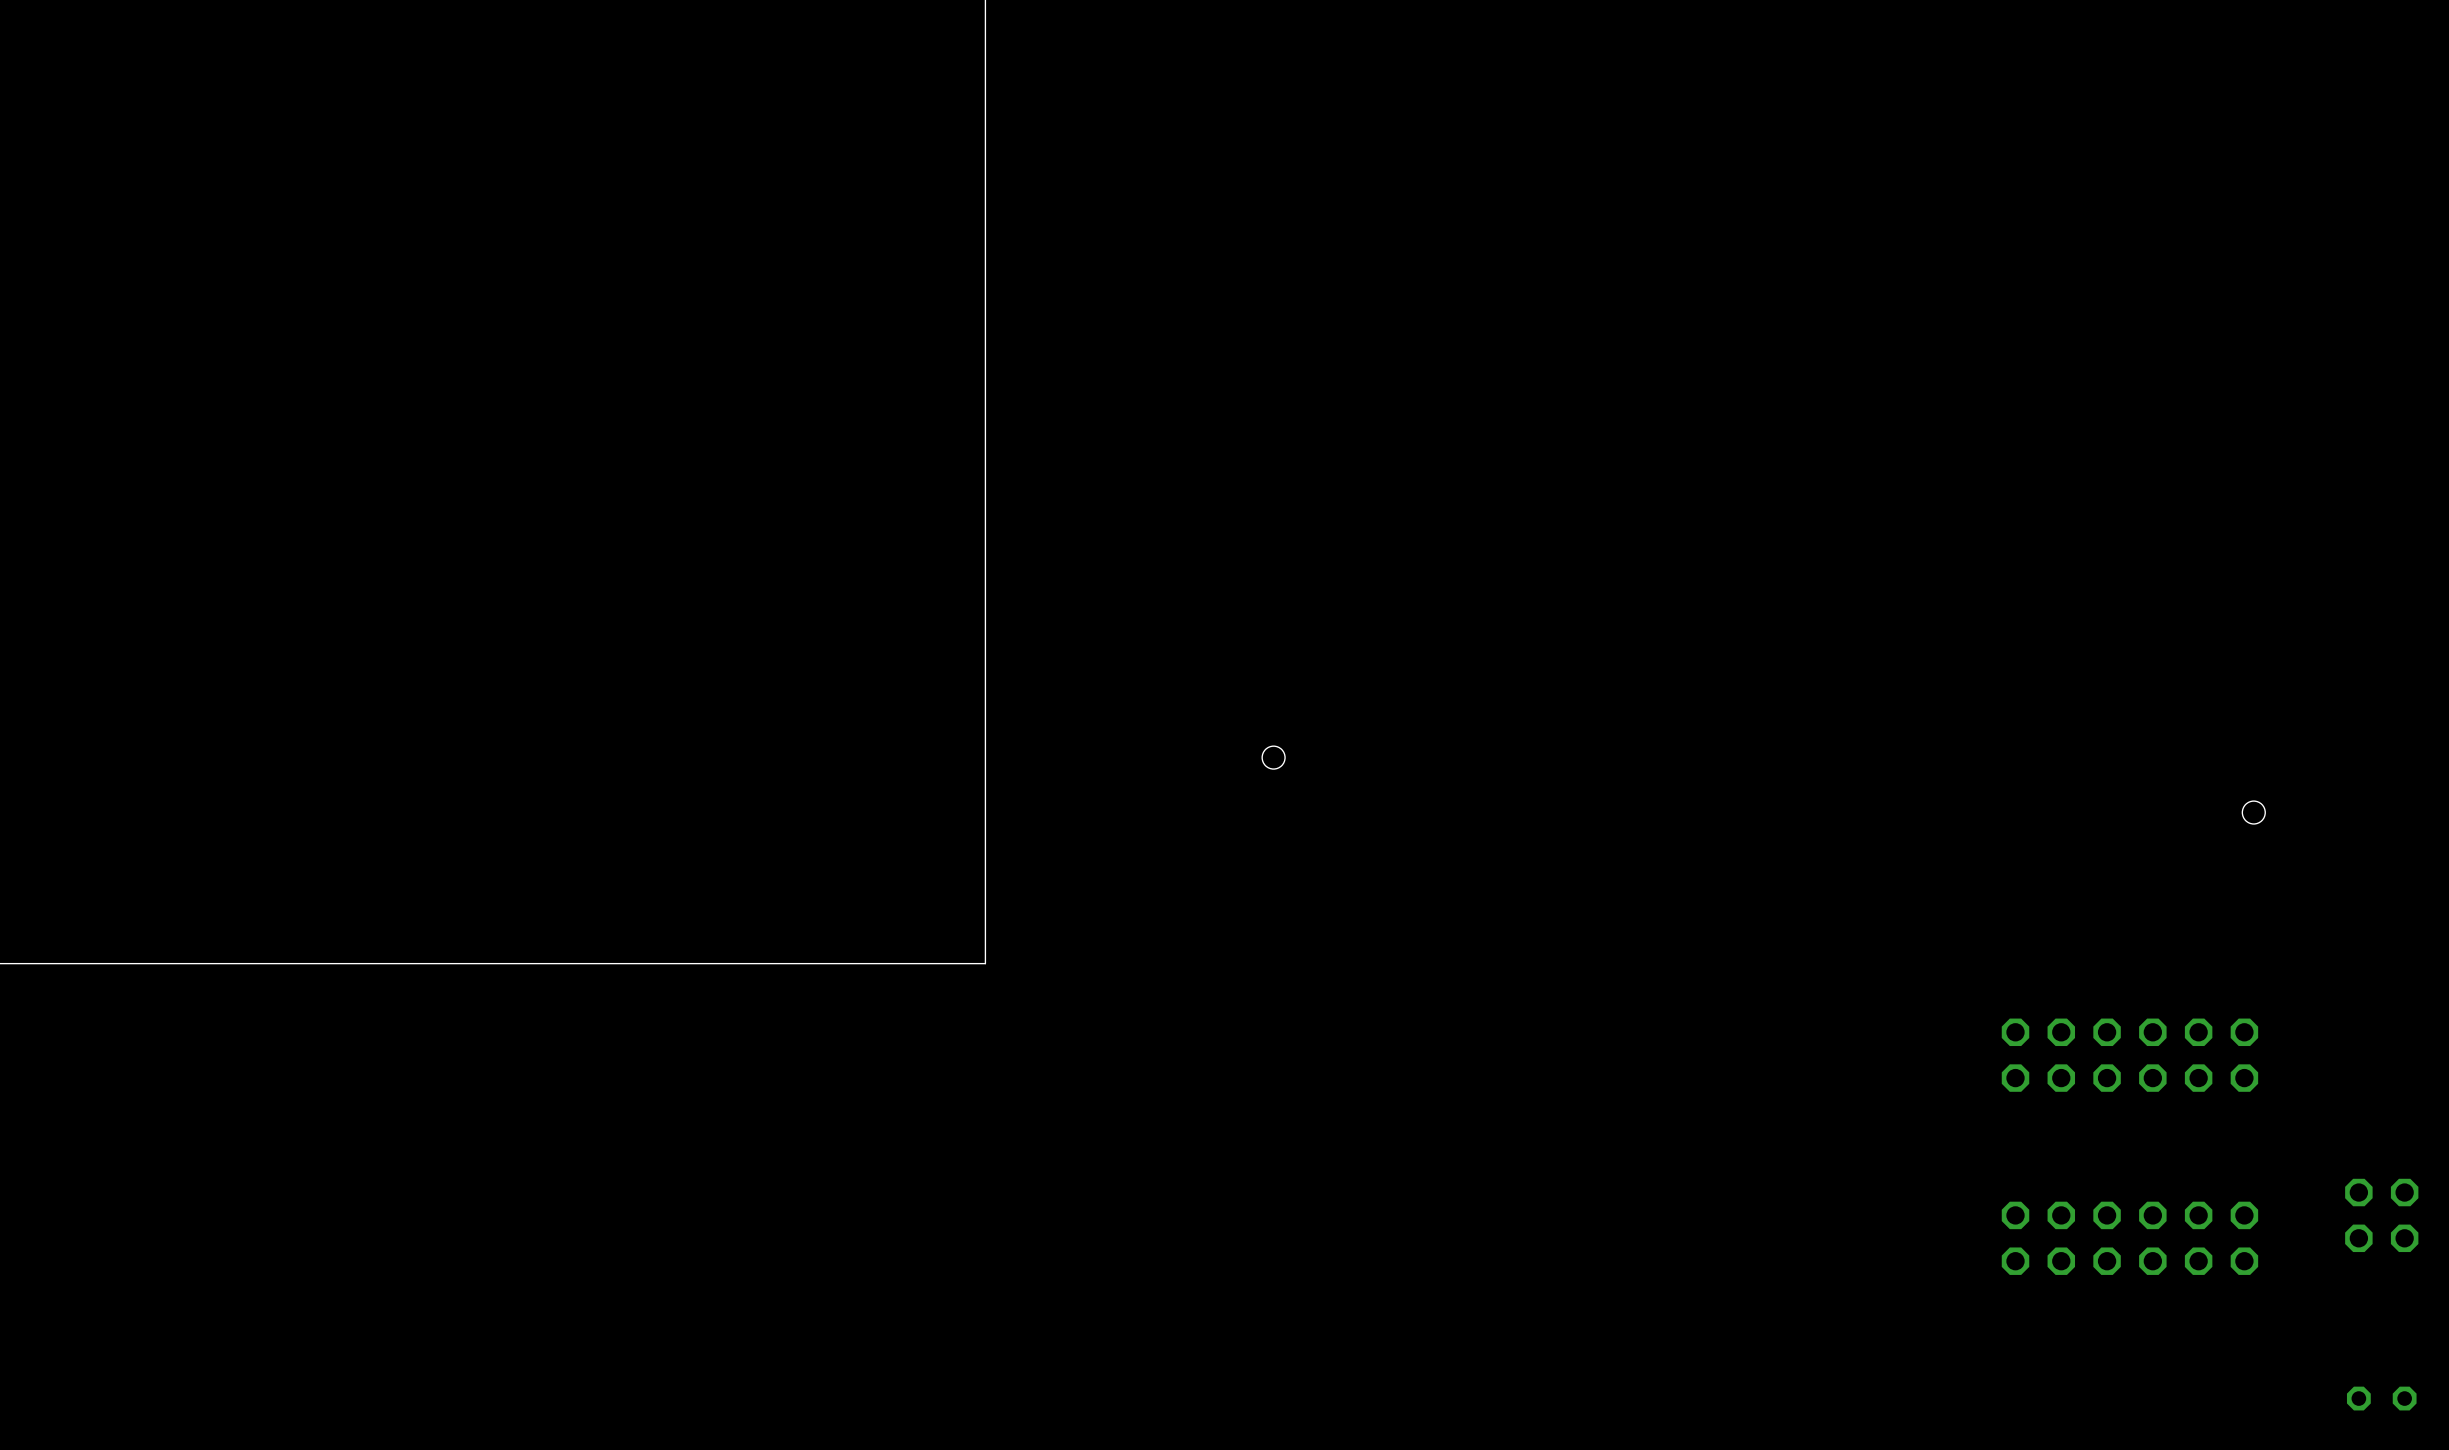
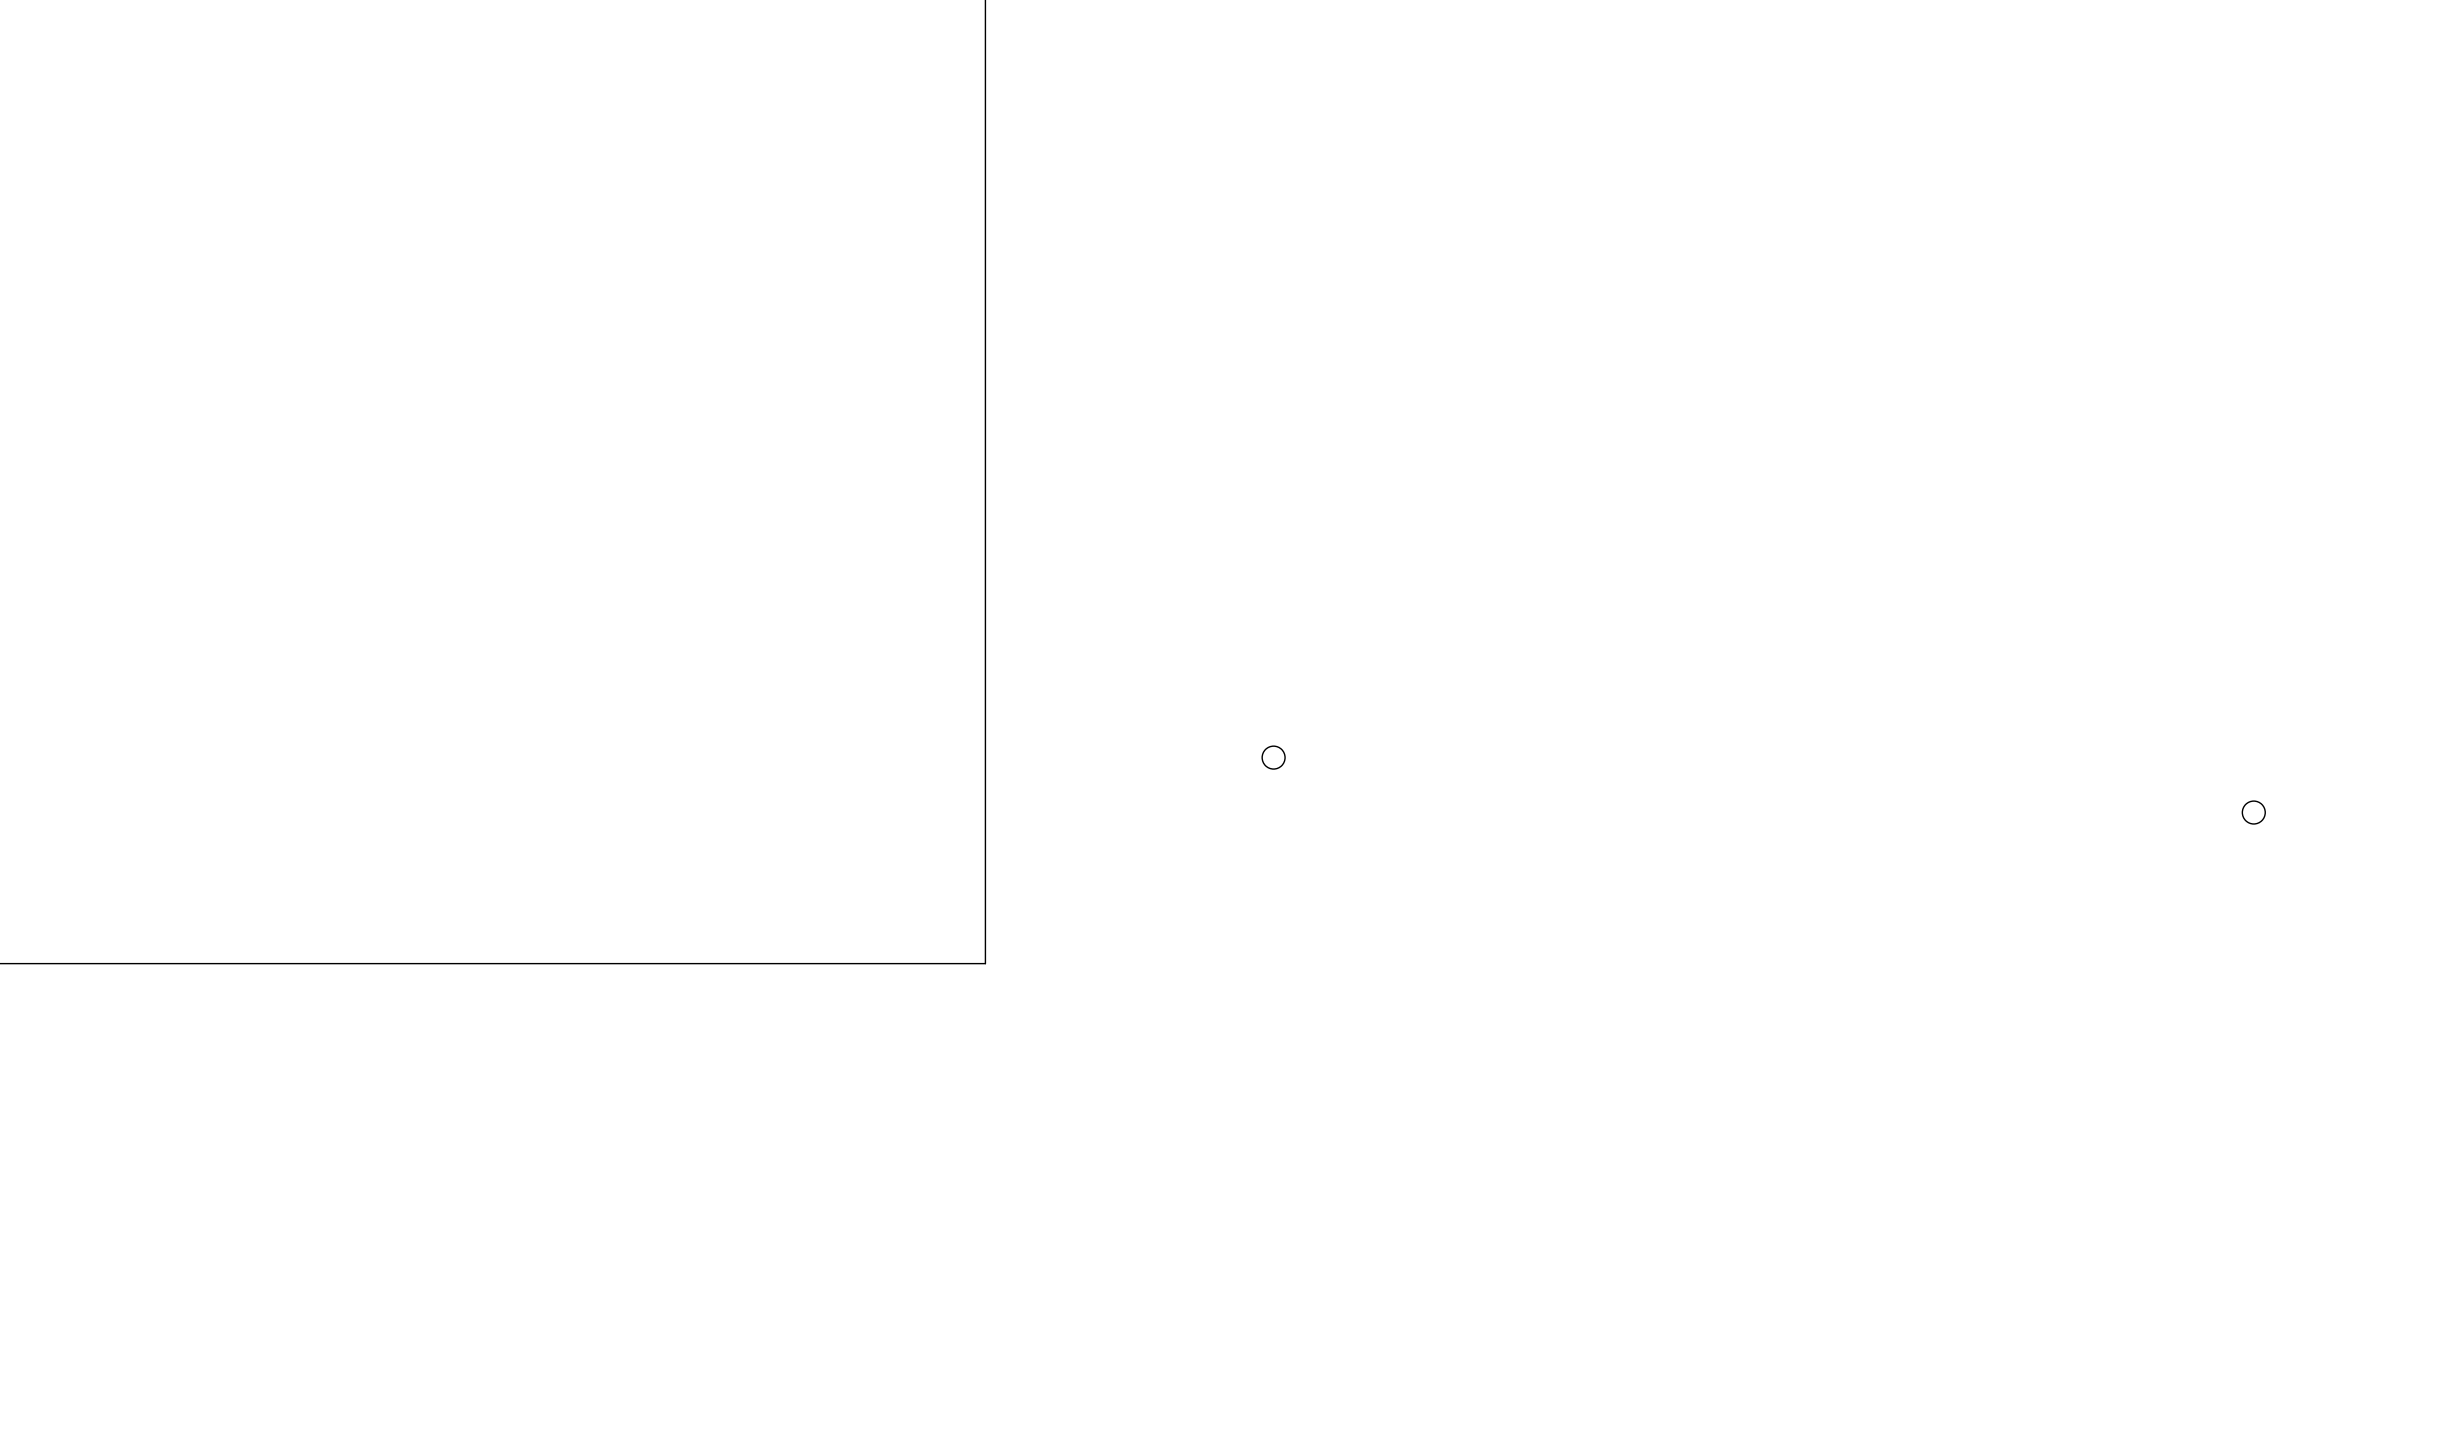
part: (2129, 1055) -> none
part: (2381, 1215) -> none
part: (2129, 1238) -> none
part: (2381, 1398) -> none

